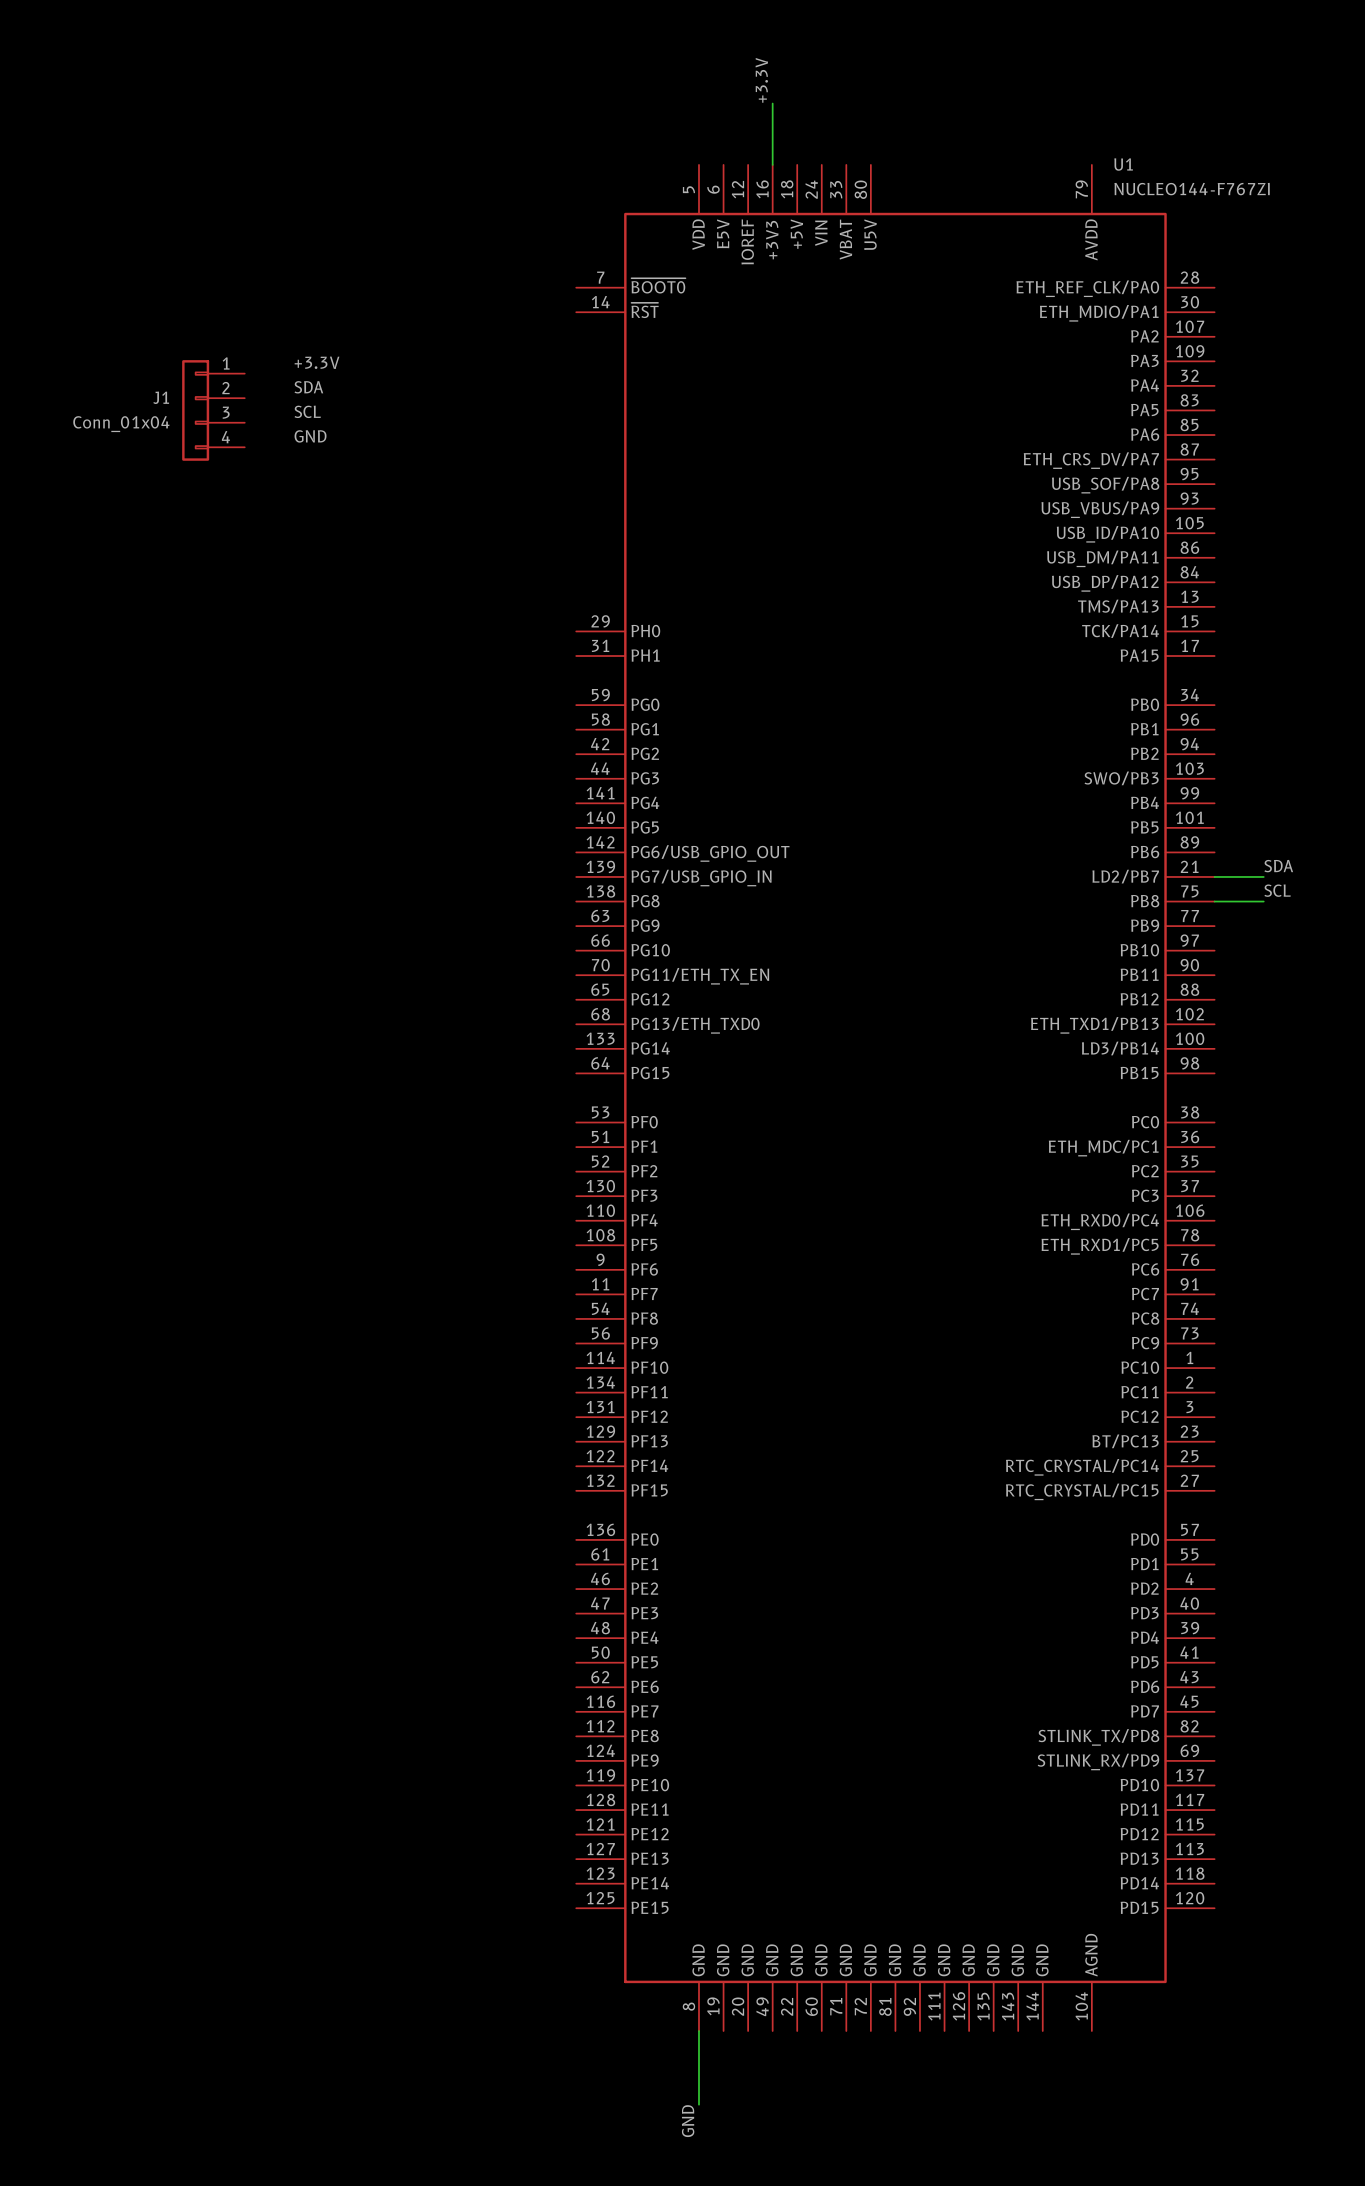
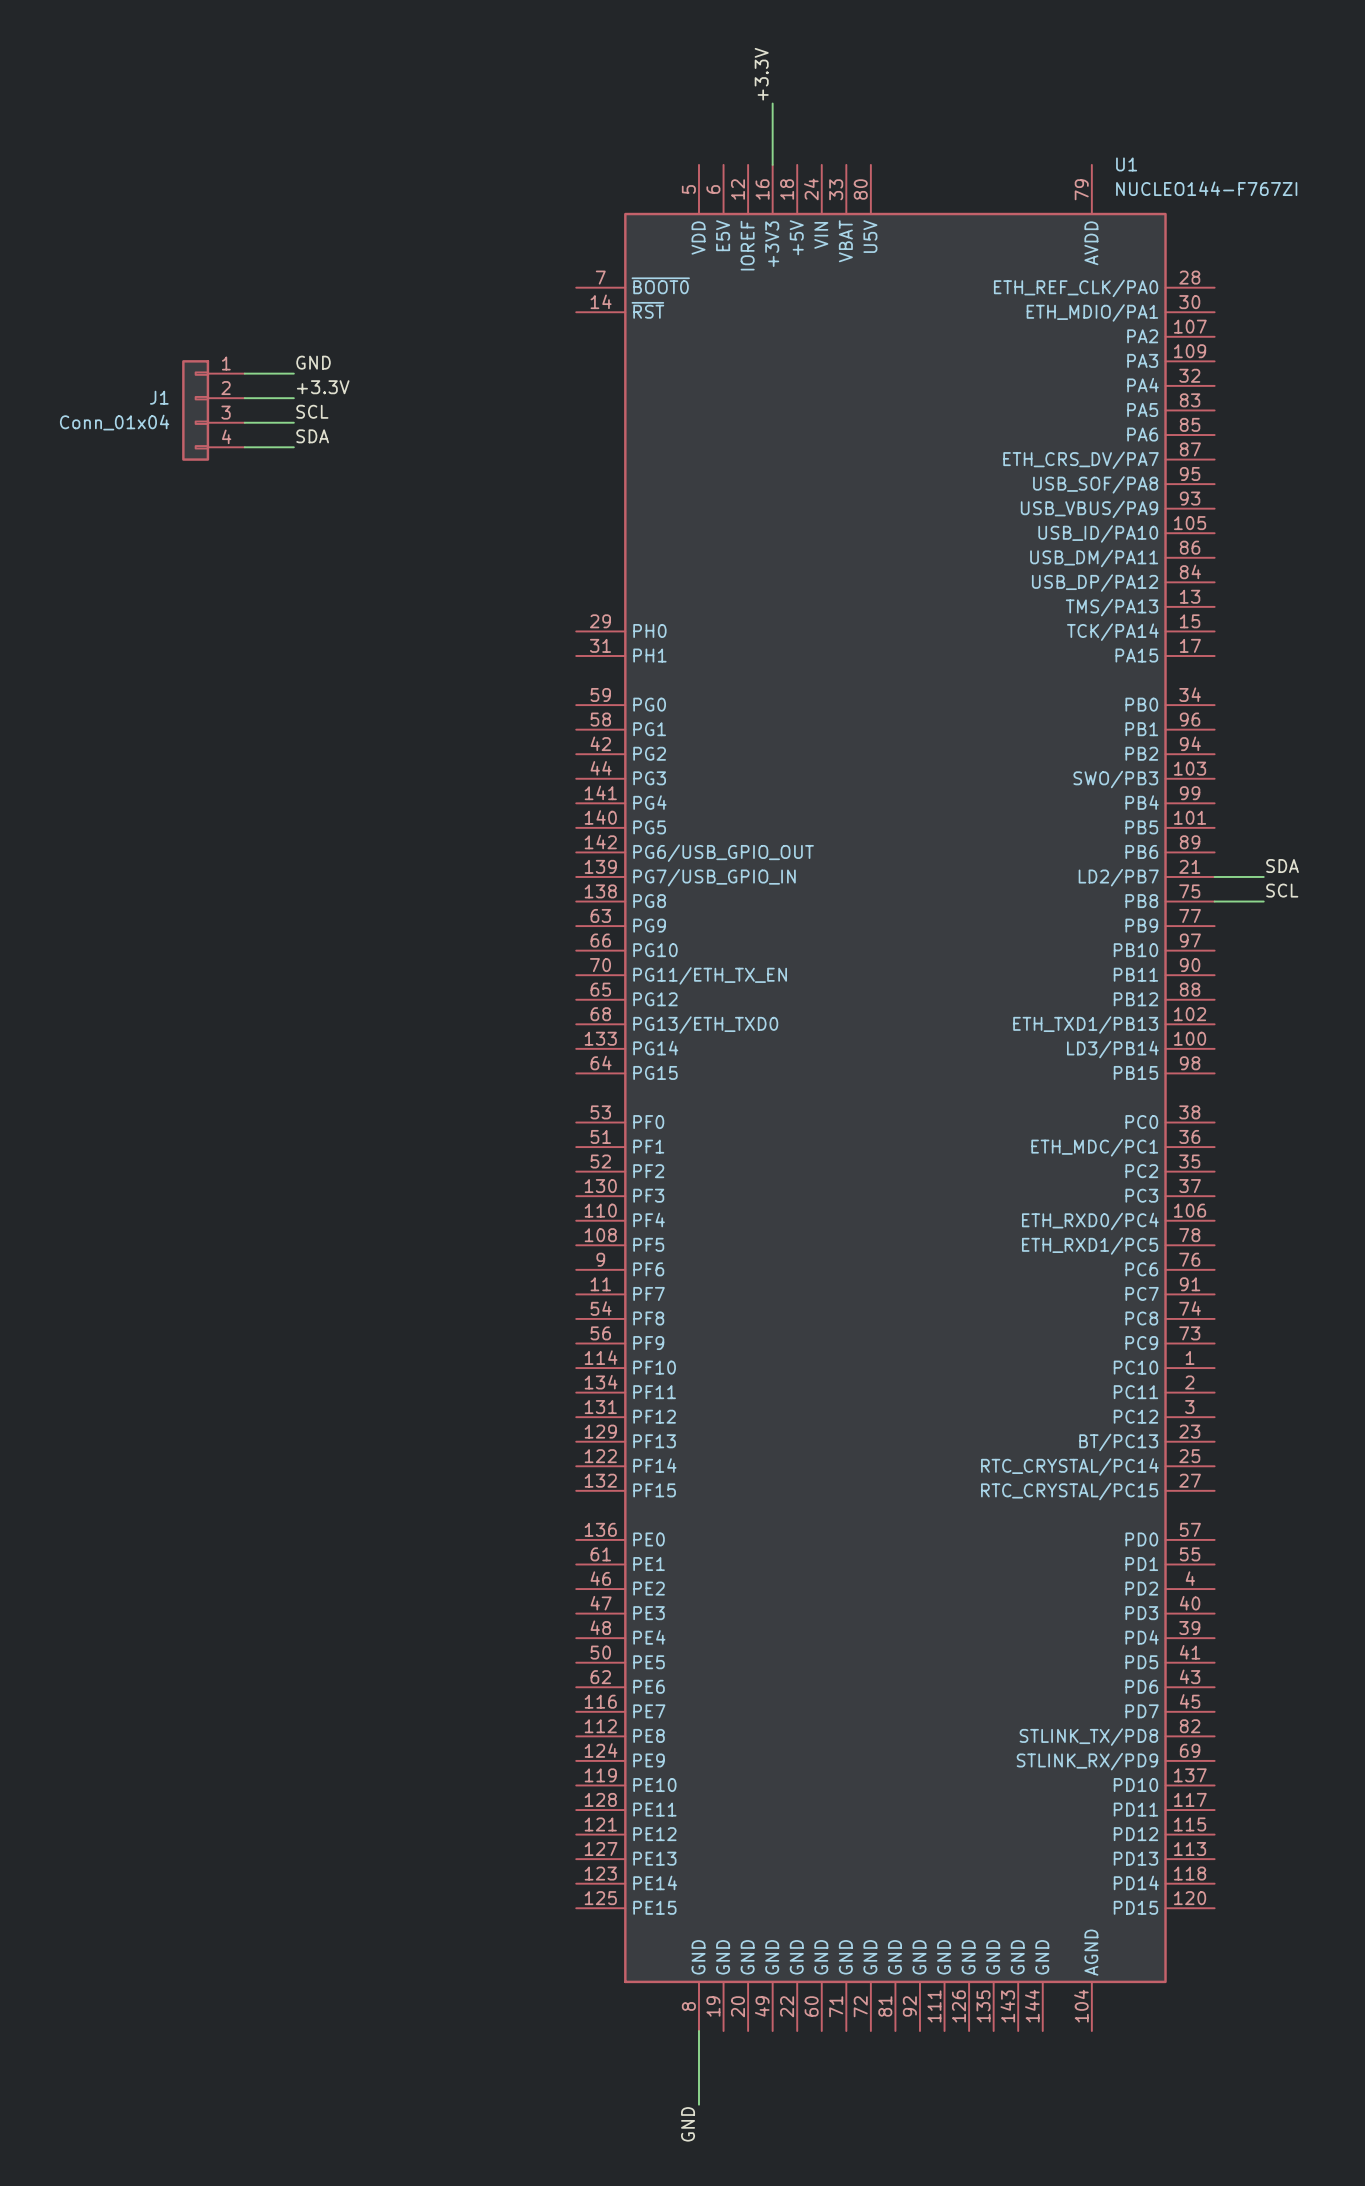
label: +3.3V (317, 362) -> GND (313, 362)
wire: none -> (244, 373) (293, 373)
label: SDA (308, 387) -> +3.3V (323, 387)
wire: none -> (244, 398) (293, 398)
wire: none -> (244, 422) (293, 422)
label: GND (310, 436) -> SDA (312, 436)
wire: none -> (244, 447) (293, 447)

